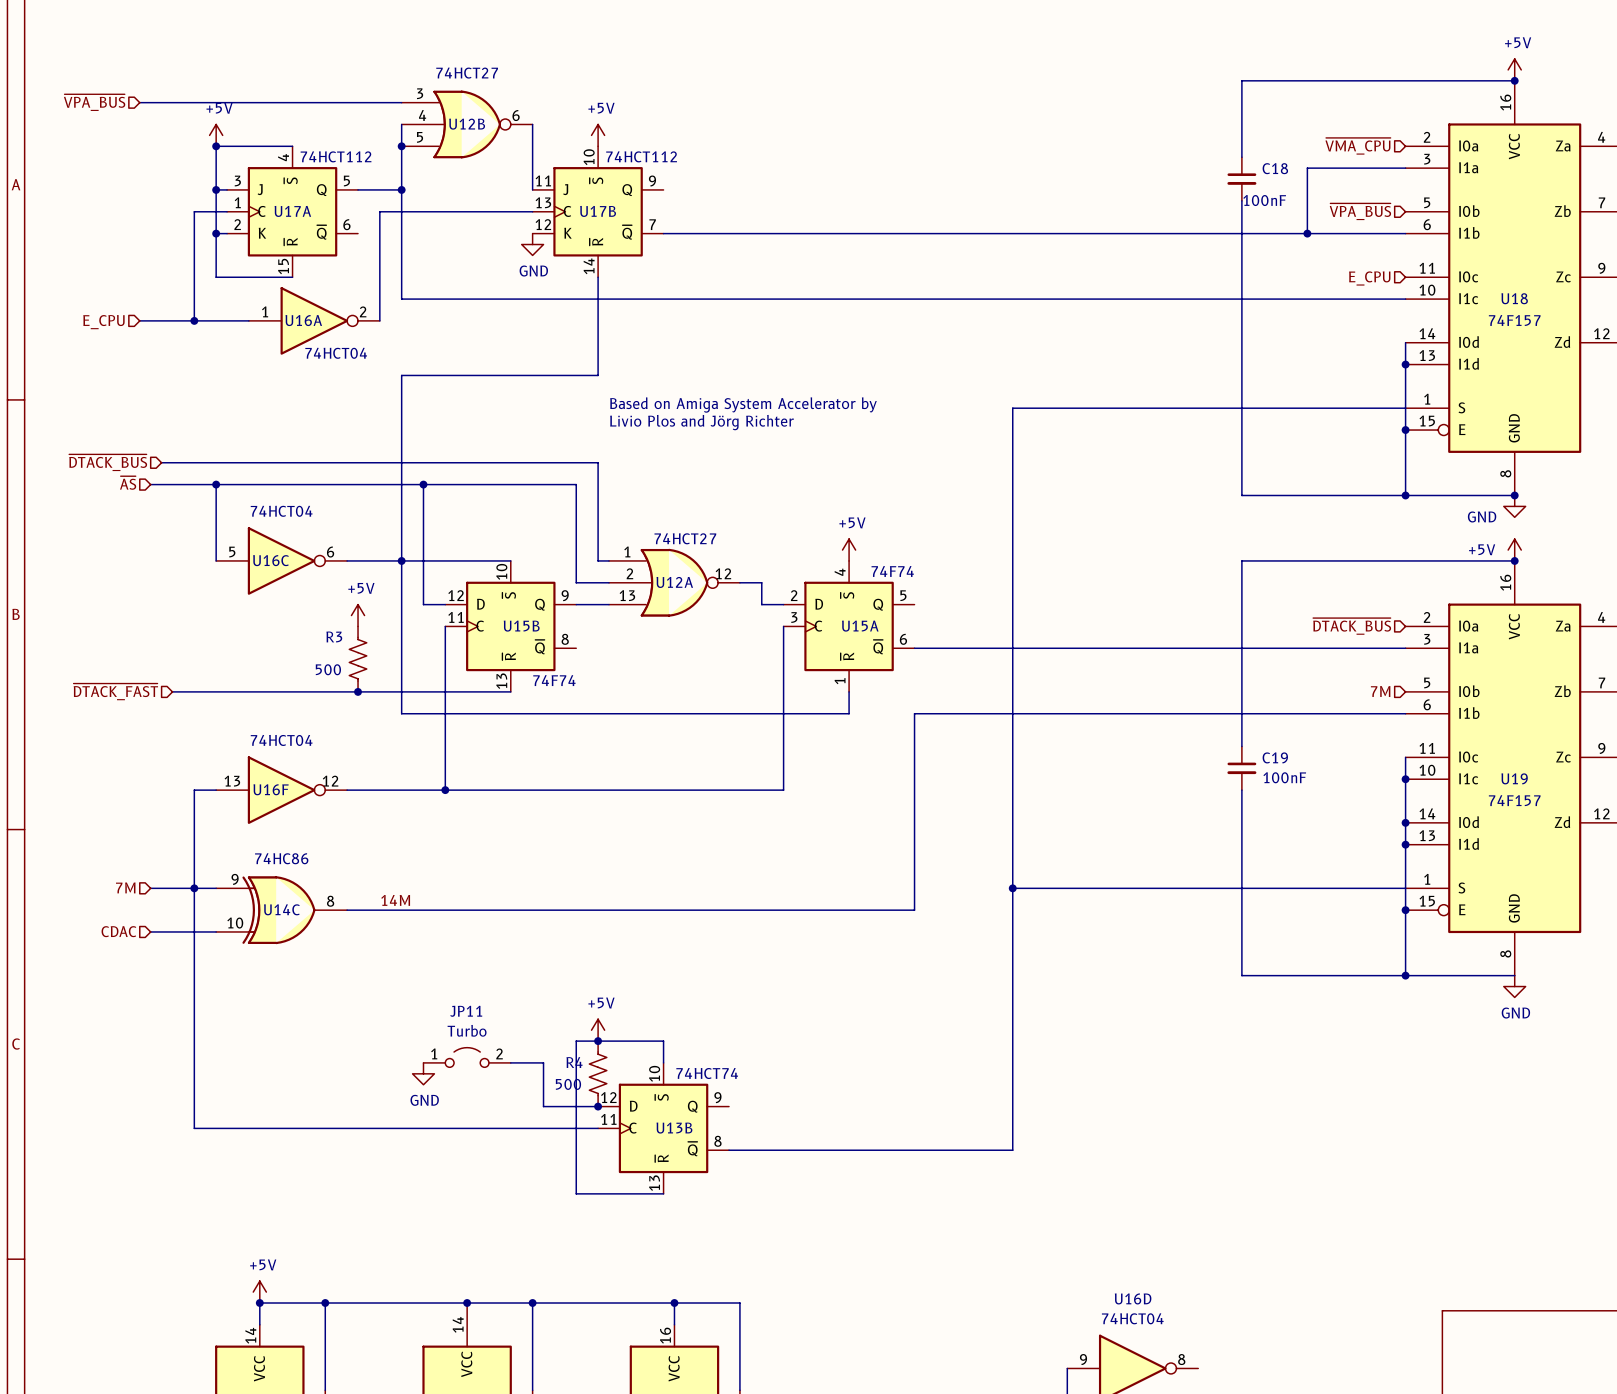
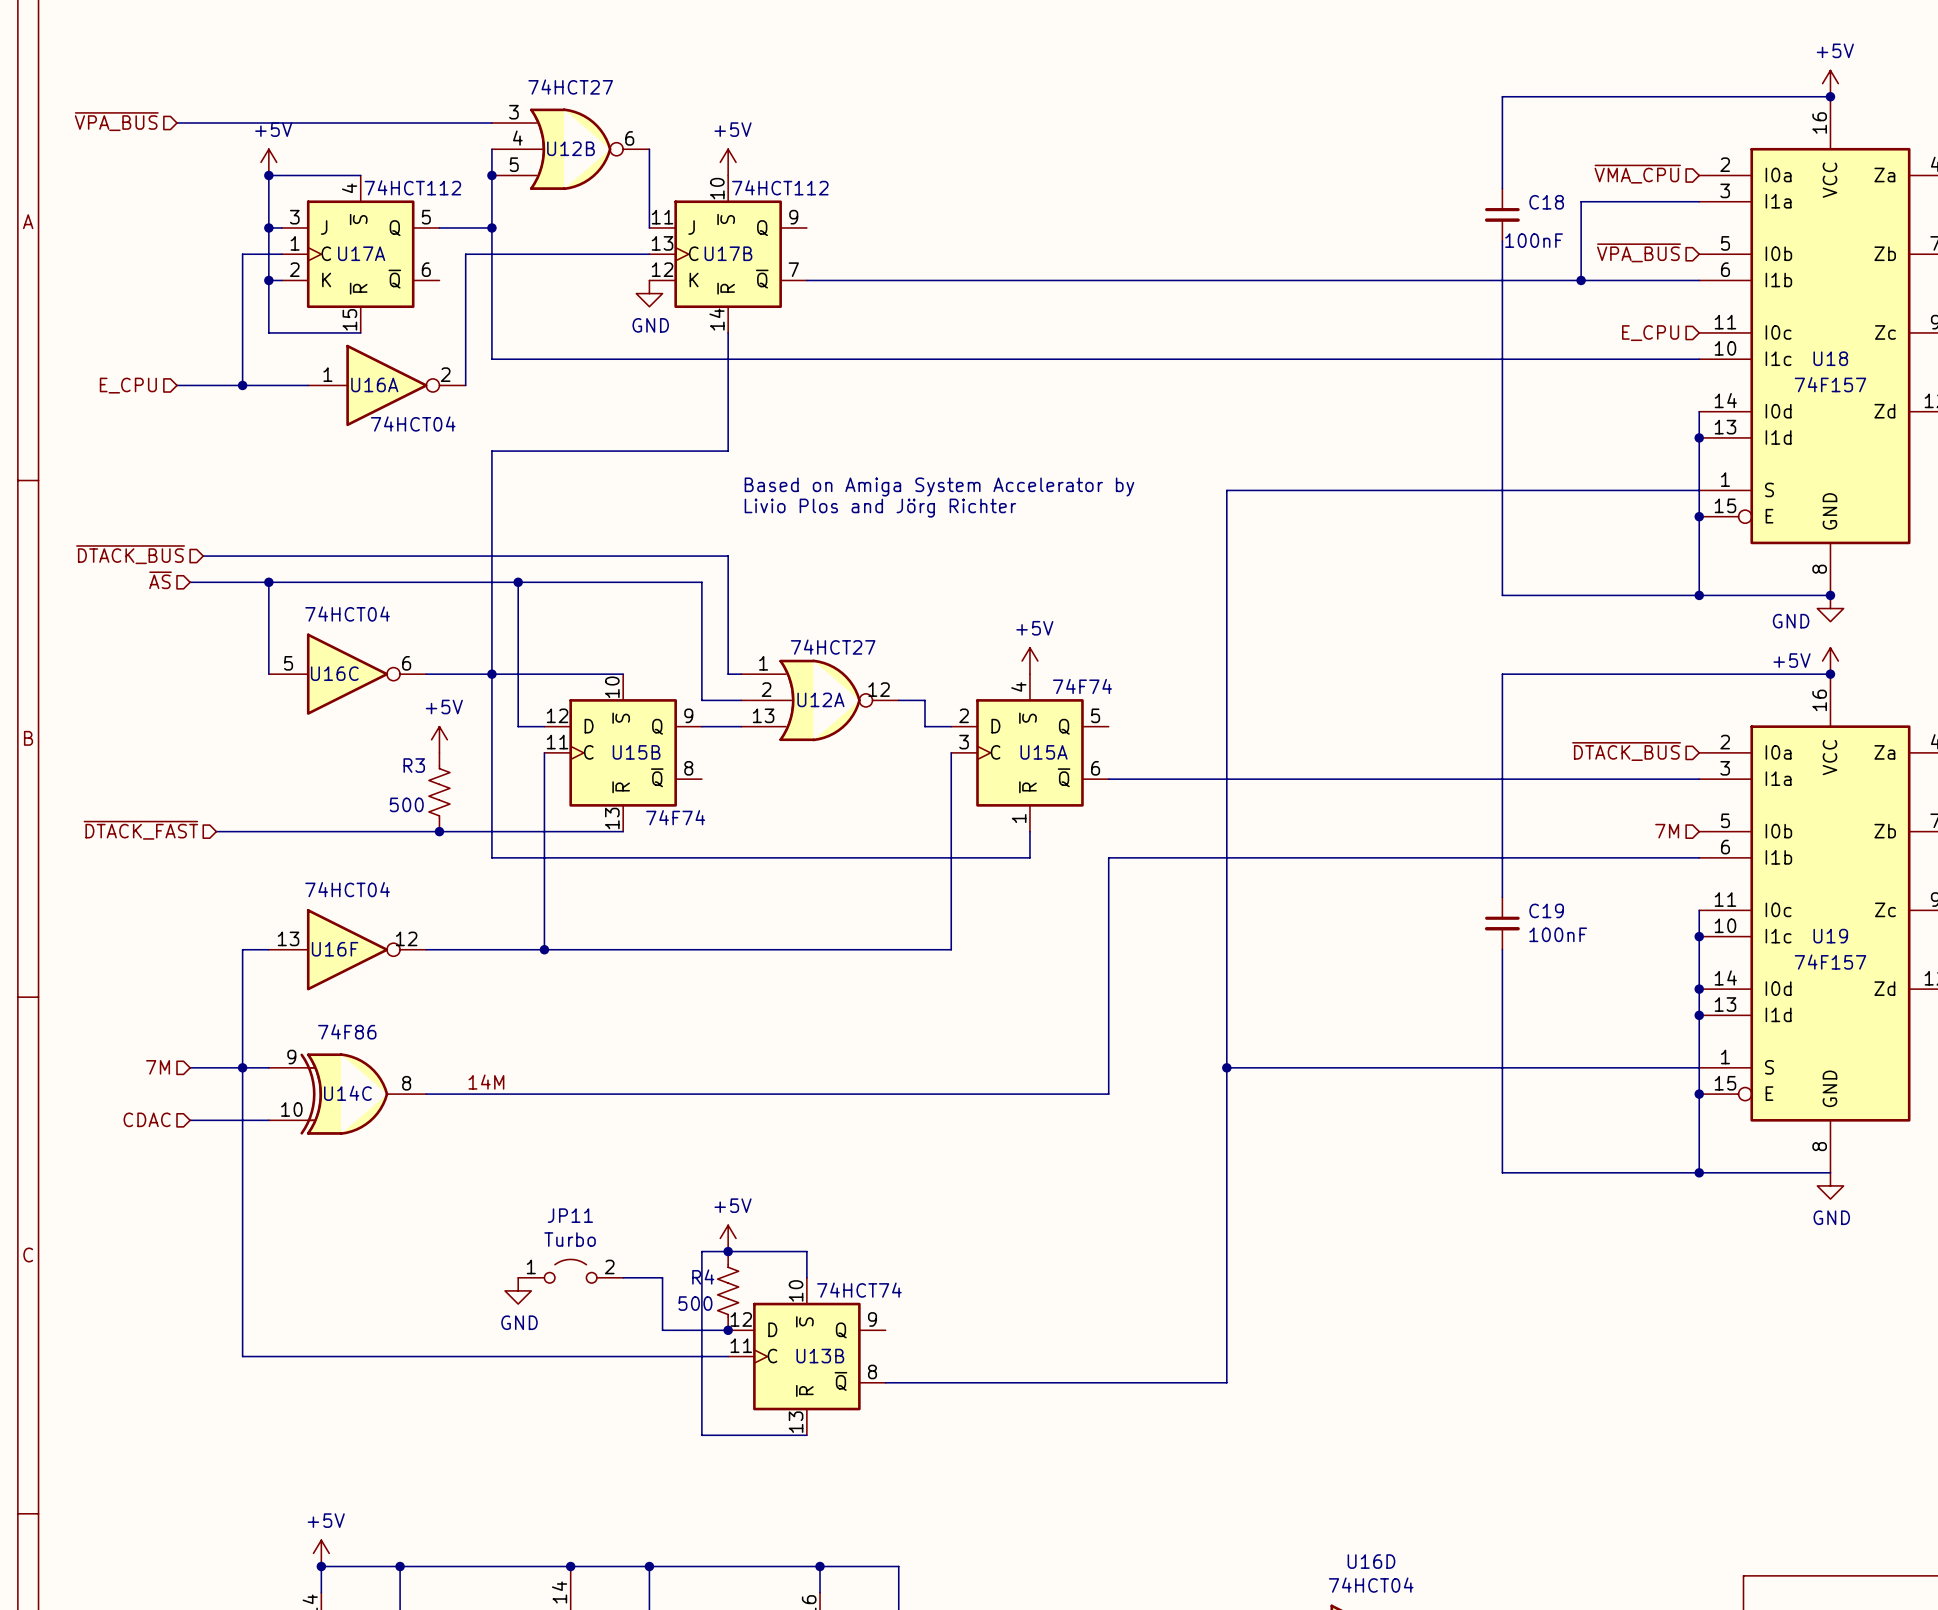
U14C value: 74HC86 (281, 858) -> 74F86 (347, 1031)

